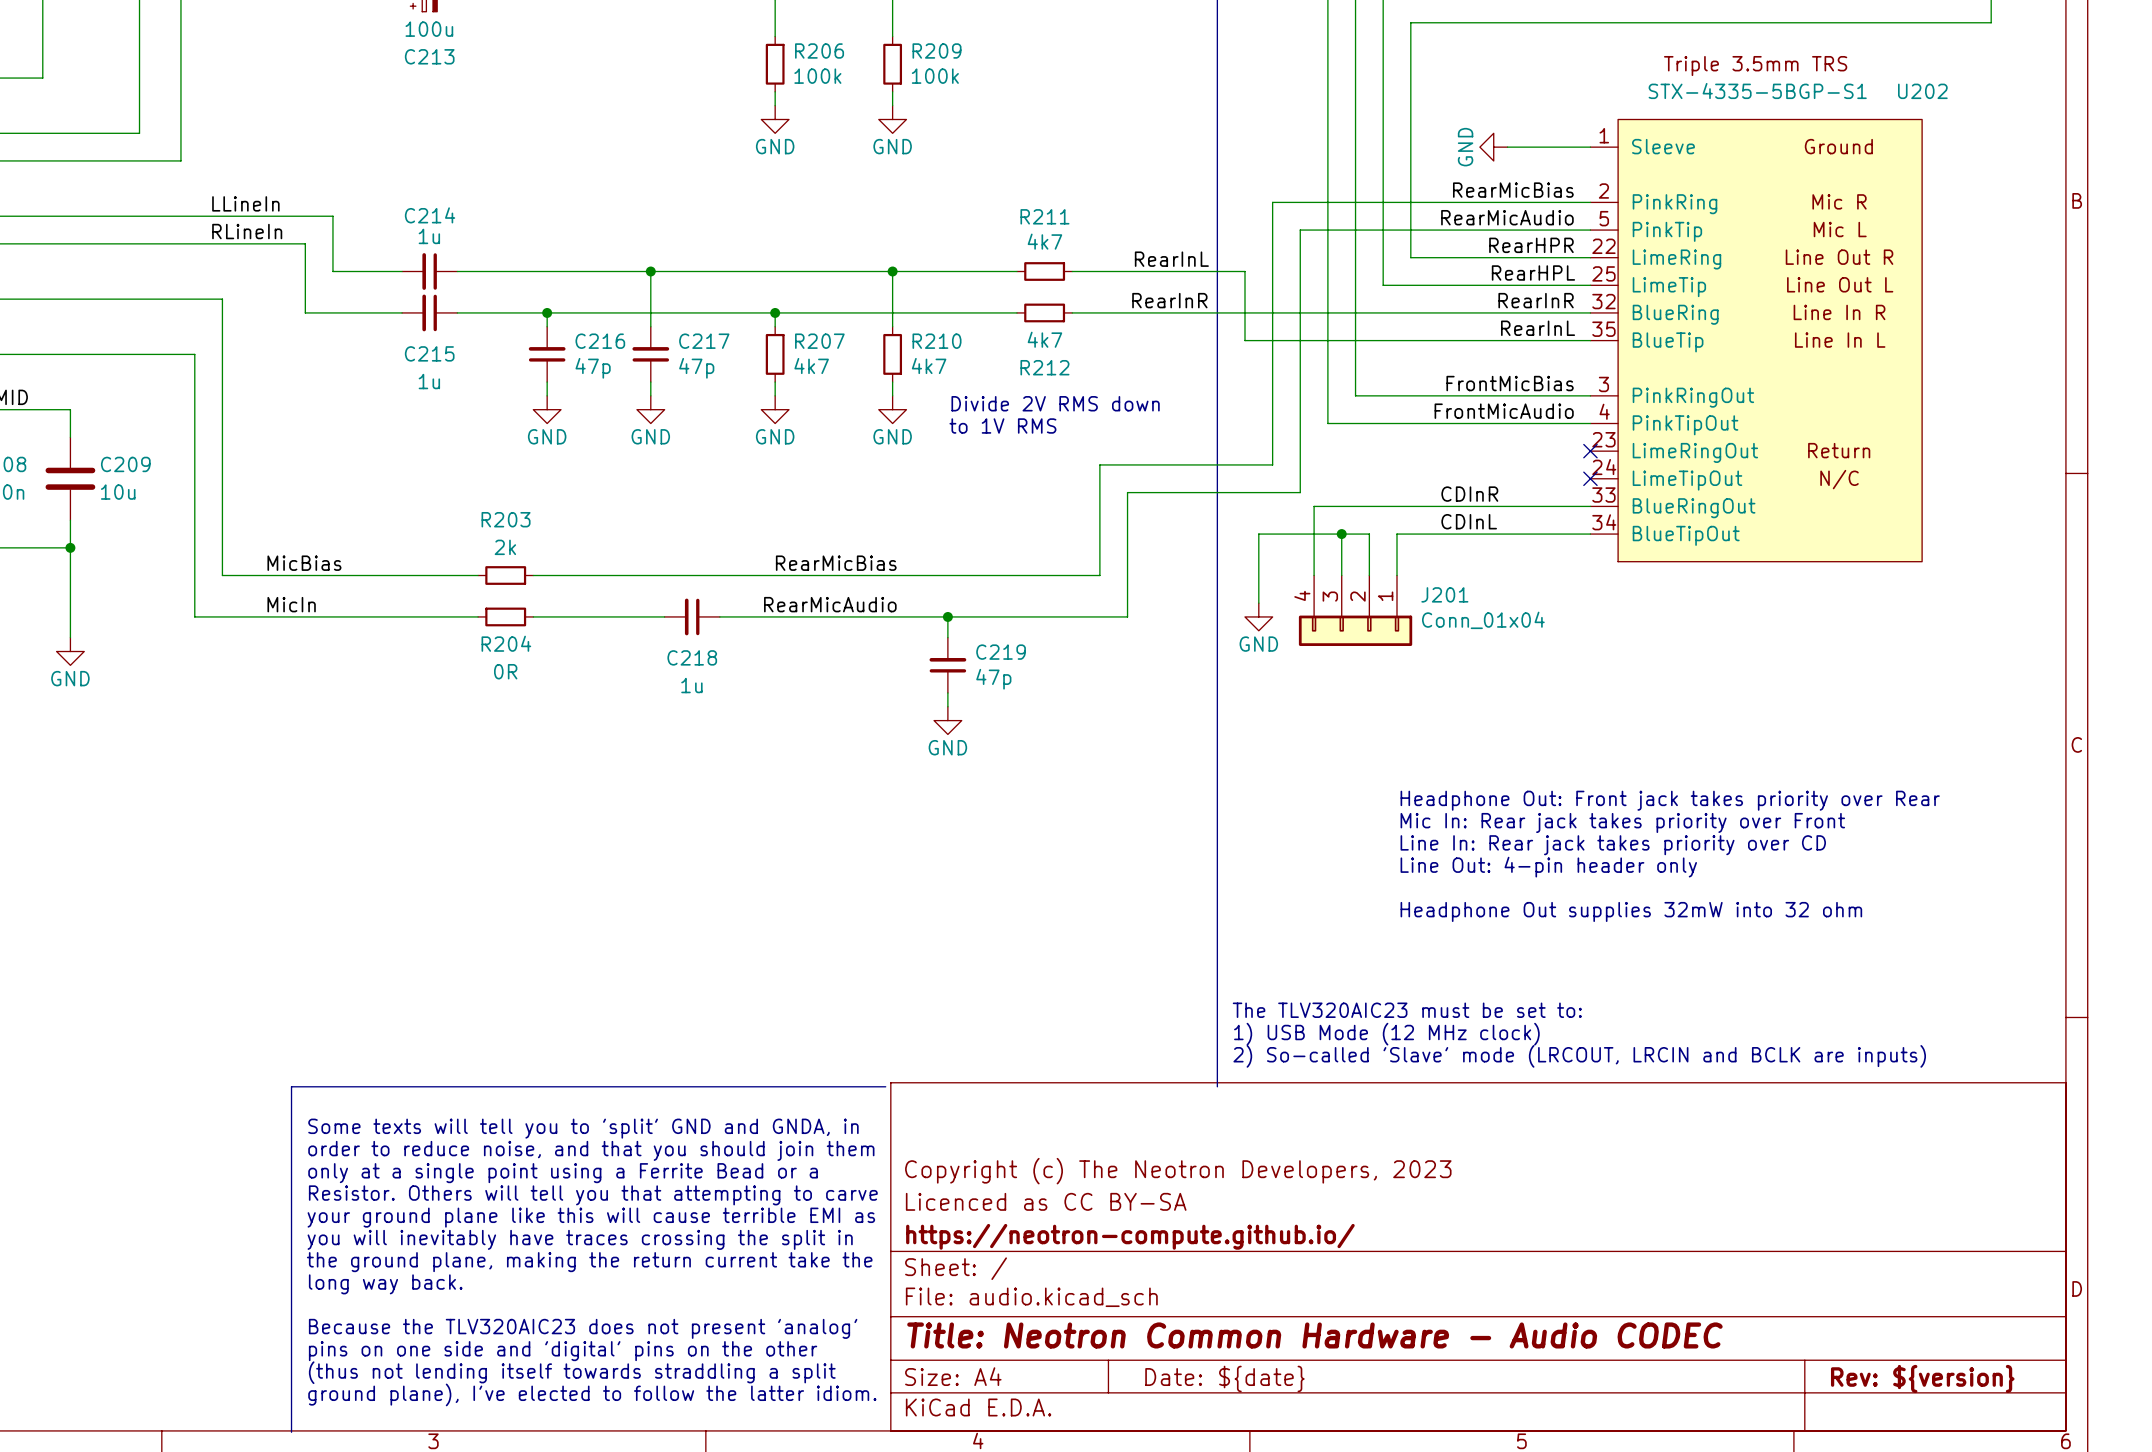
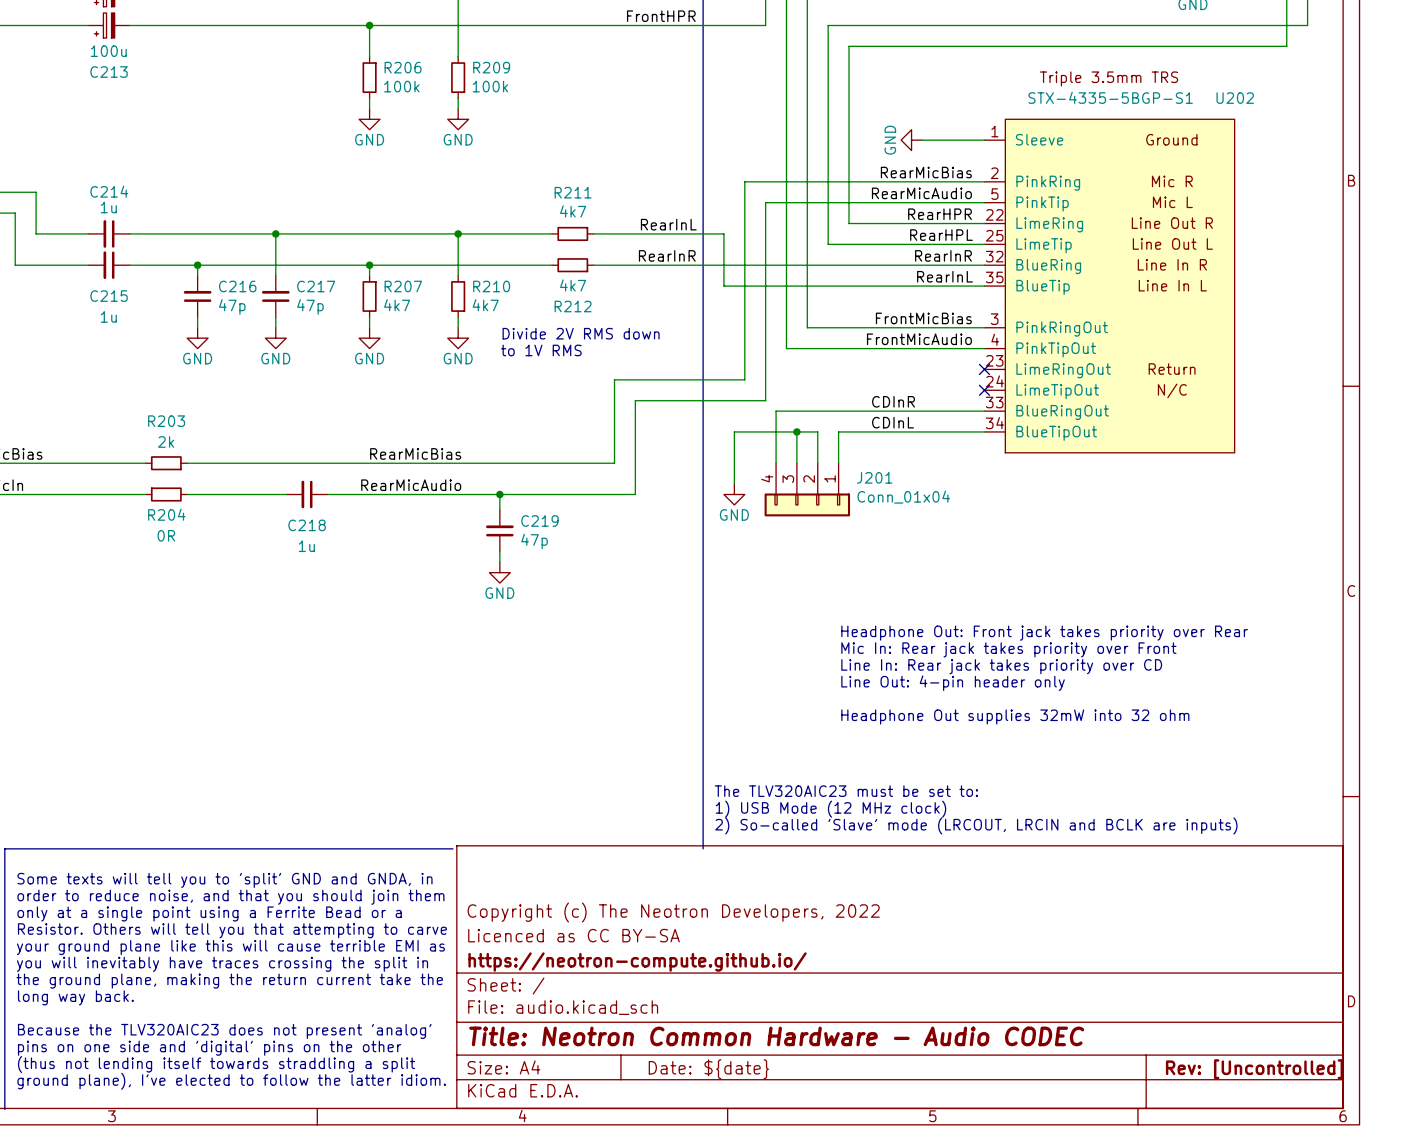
title block: Copyright (c) The Neotron Developers, 2023 (1178, 1171) -> Copyright (c) The Neotron Developers, 2022 (673, 912)
title block: Rev: ${version} (1922, 1378) -> Rev: [Uncontrolled] (1254, 1069)

